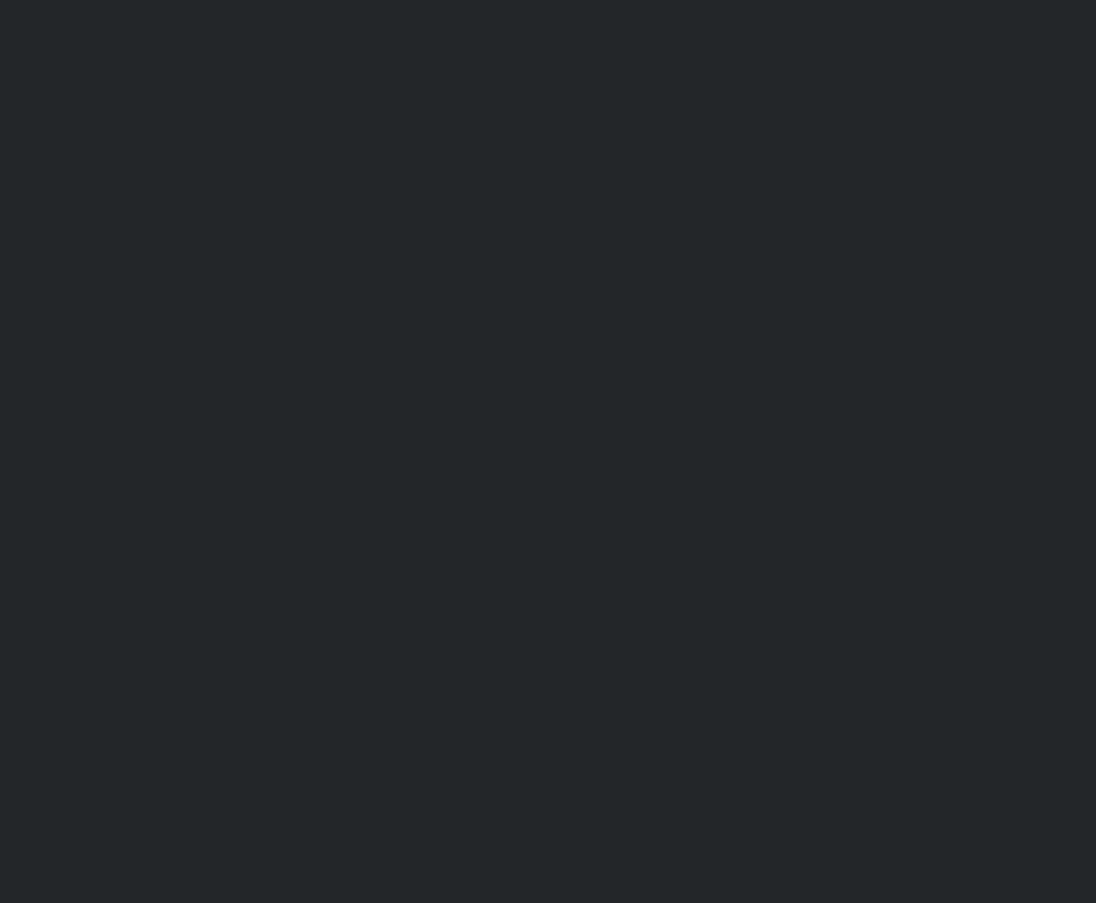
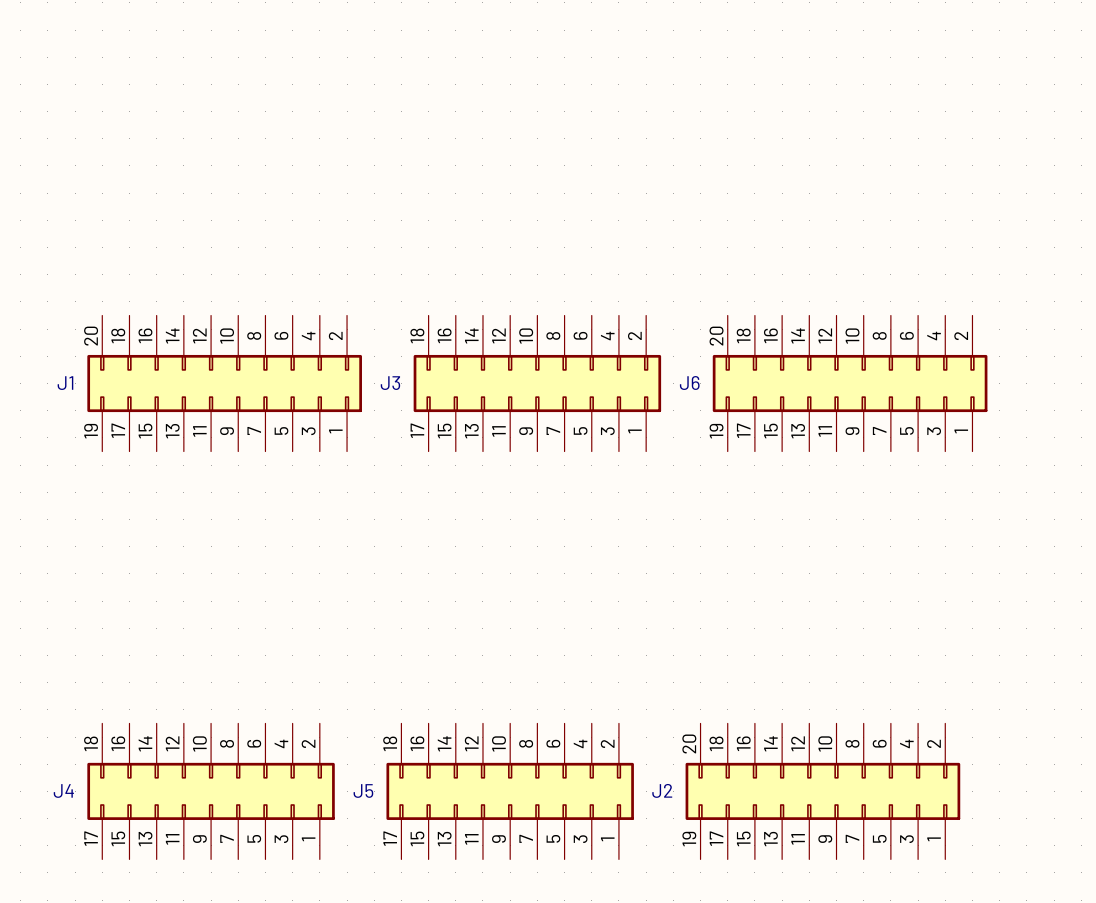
J1: none -> (224, 383)
J3: none -> (537, 383)
J6: none -> (850, 383)
J4: none -> (211, 791)
J5: none -> (510, 791)
J2: none -> (822, 791)

